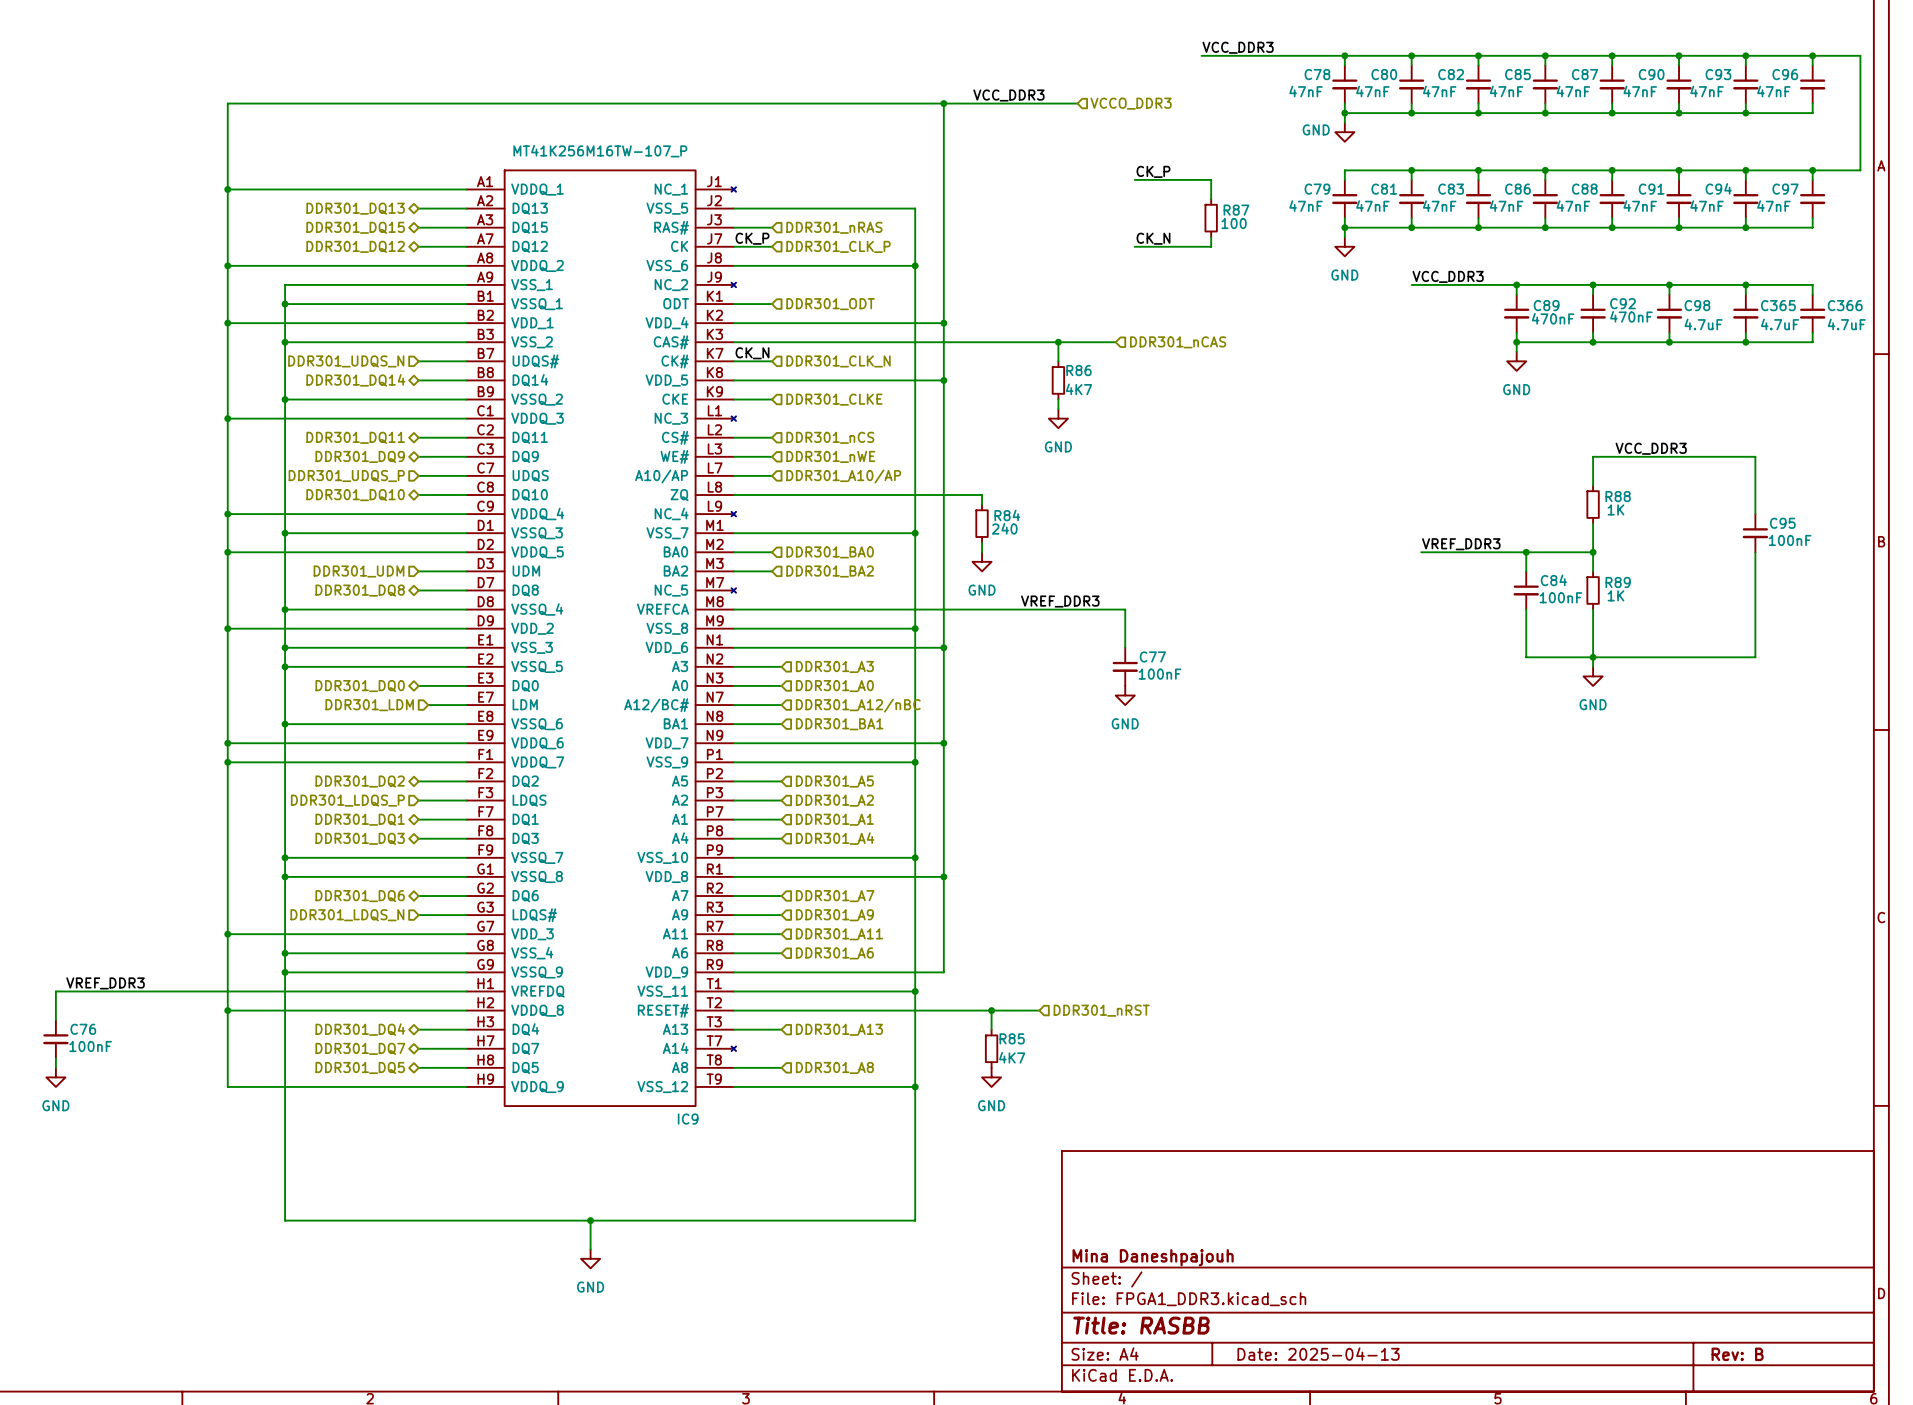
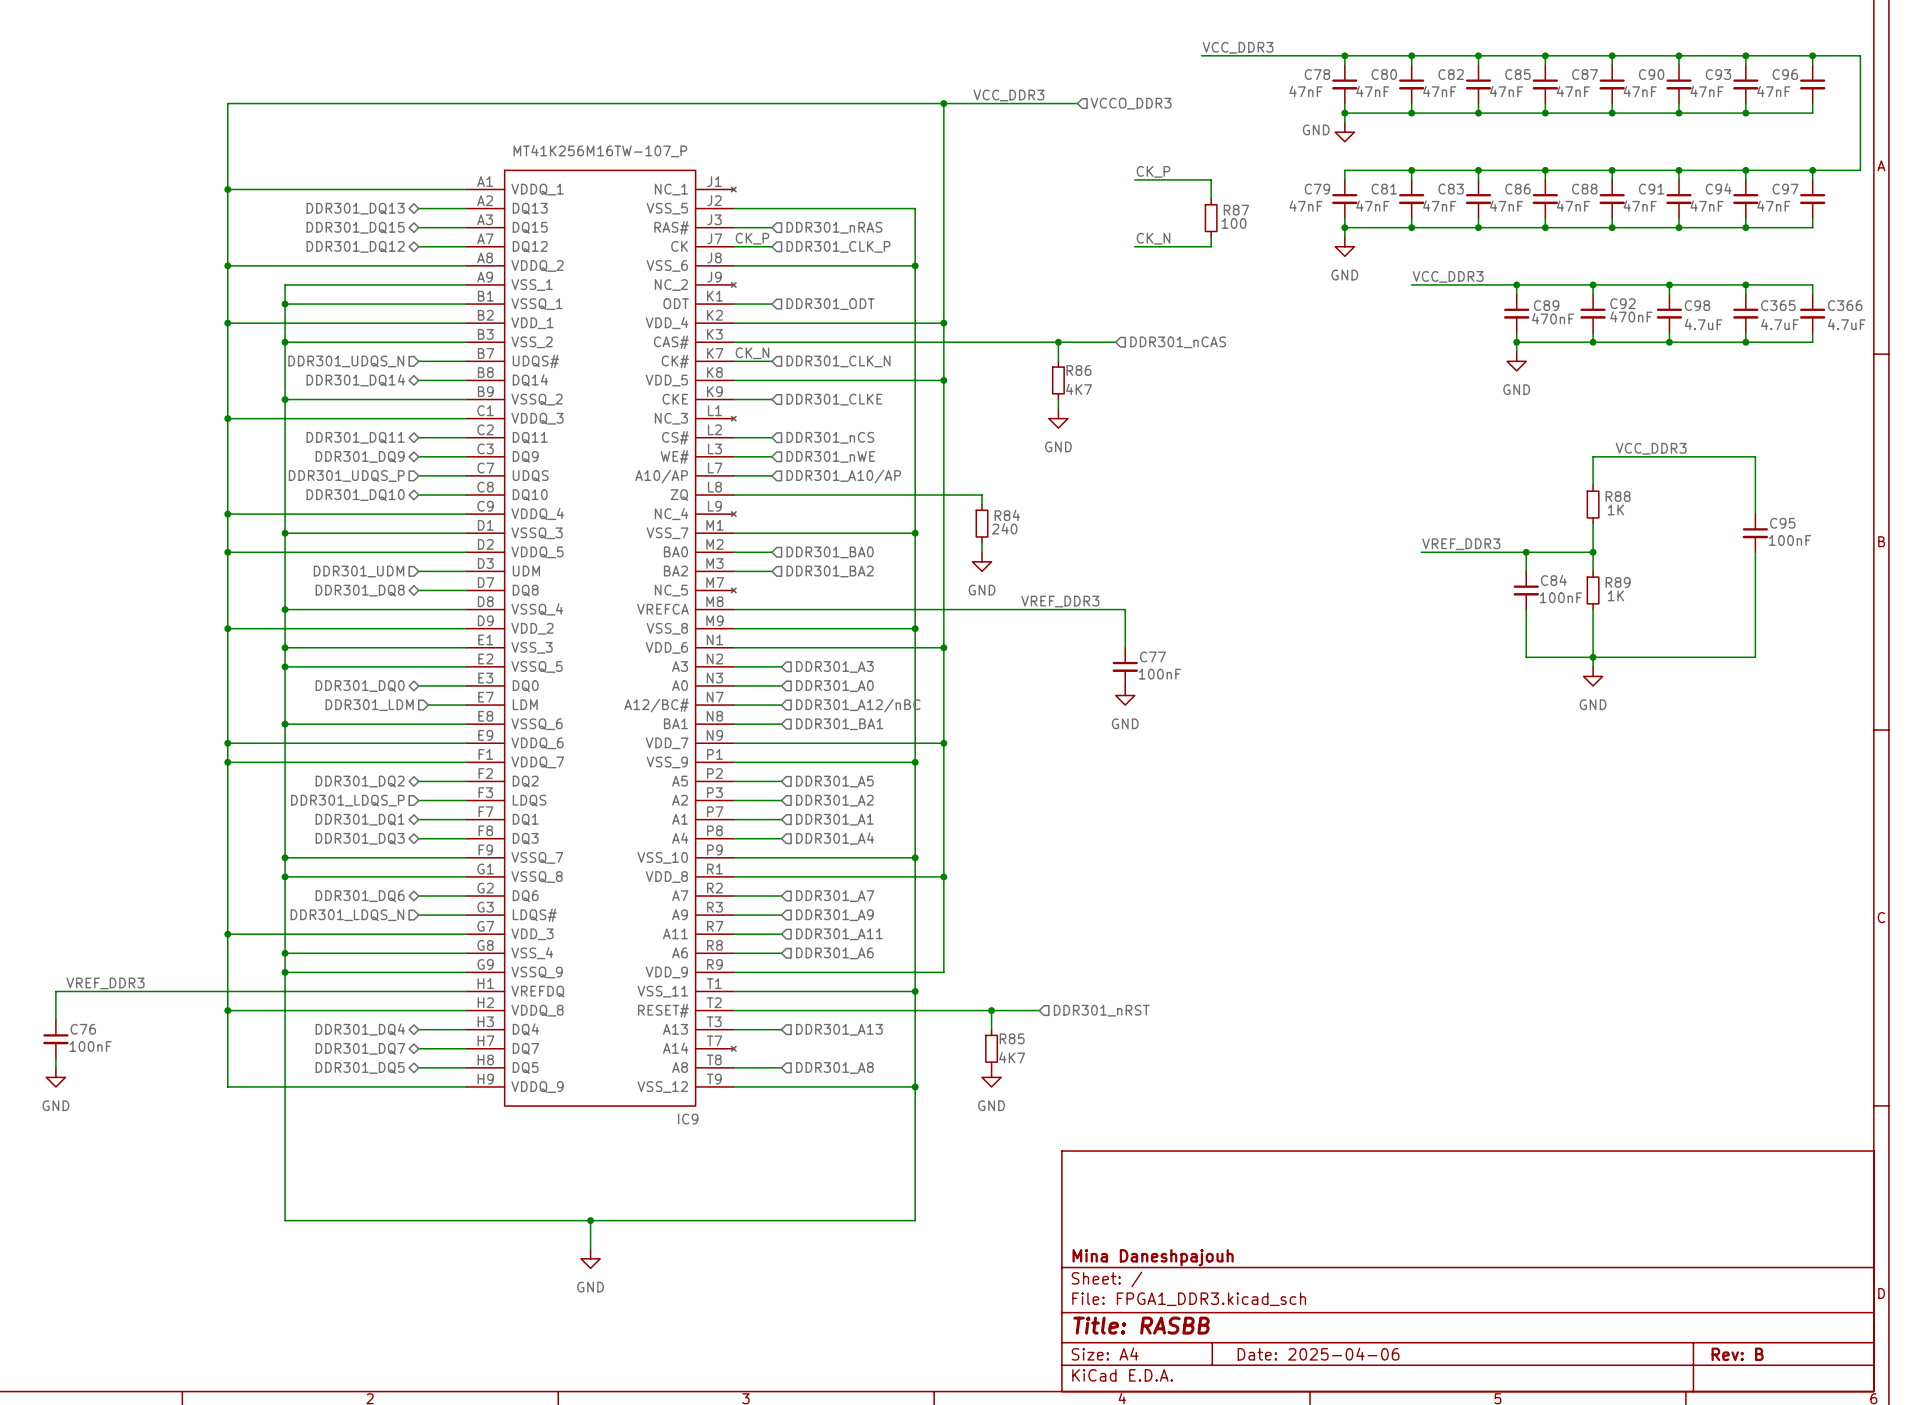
title block: Date: 2025-04-13 (1318, 1354) -> Date: 2025-04-06 (1318, 1354)

